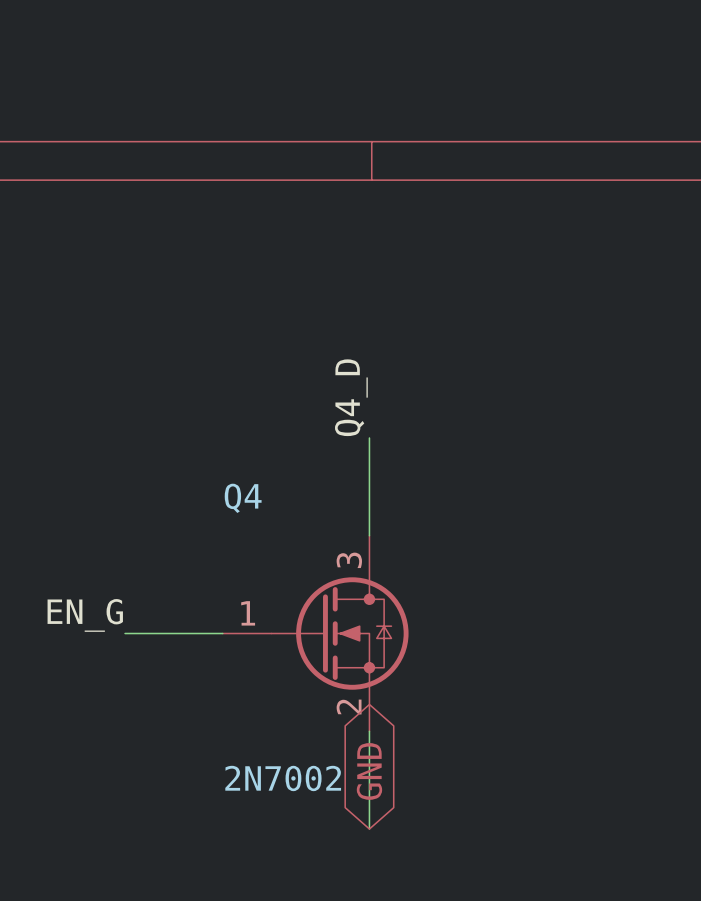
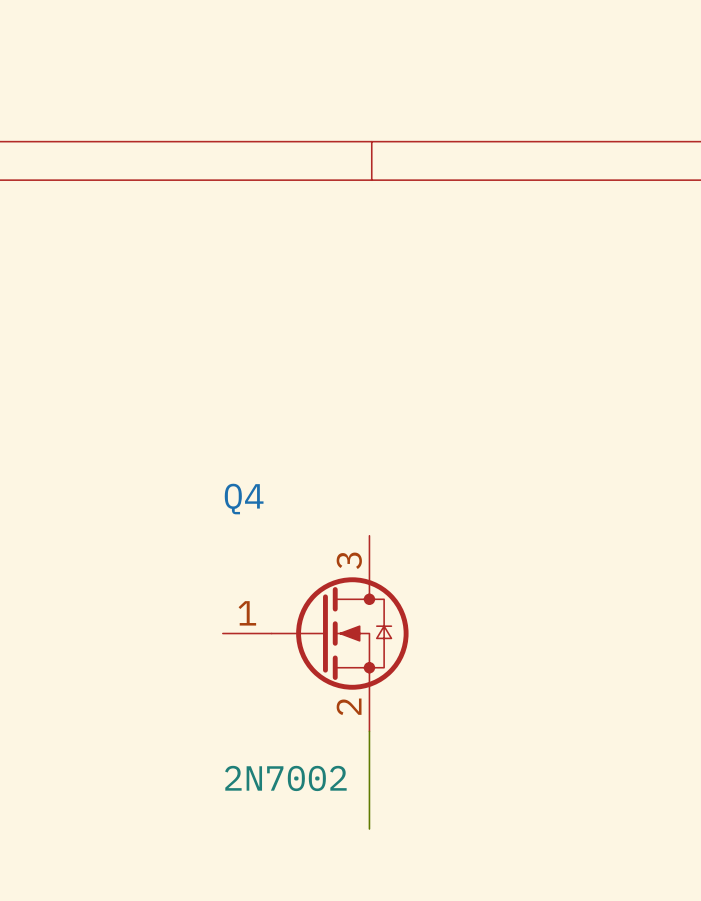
label: Q4_D (351, 397) -> none
wire: (369, 438) (369, 535) -> none
label: EN_G (85, 615) -> none
wire: (125, 633) (222, 633) -> none
global label: GND (369, 771) -> none

